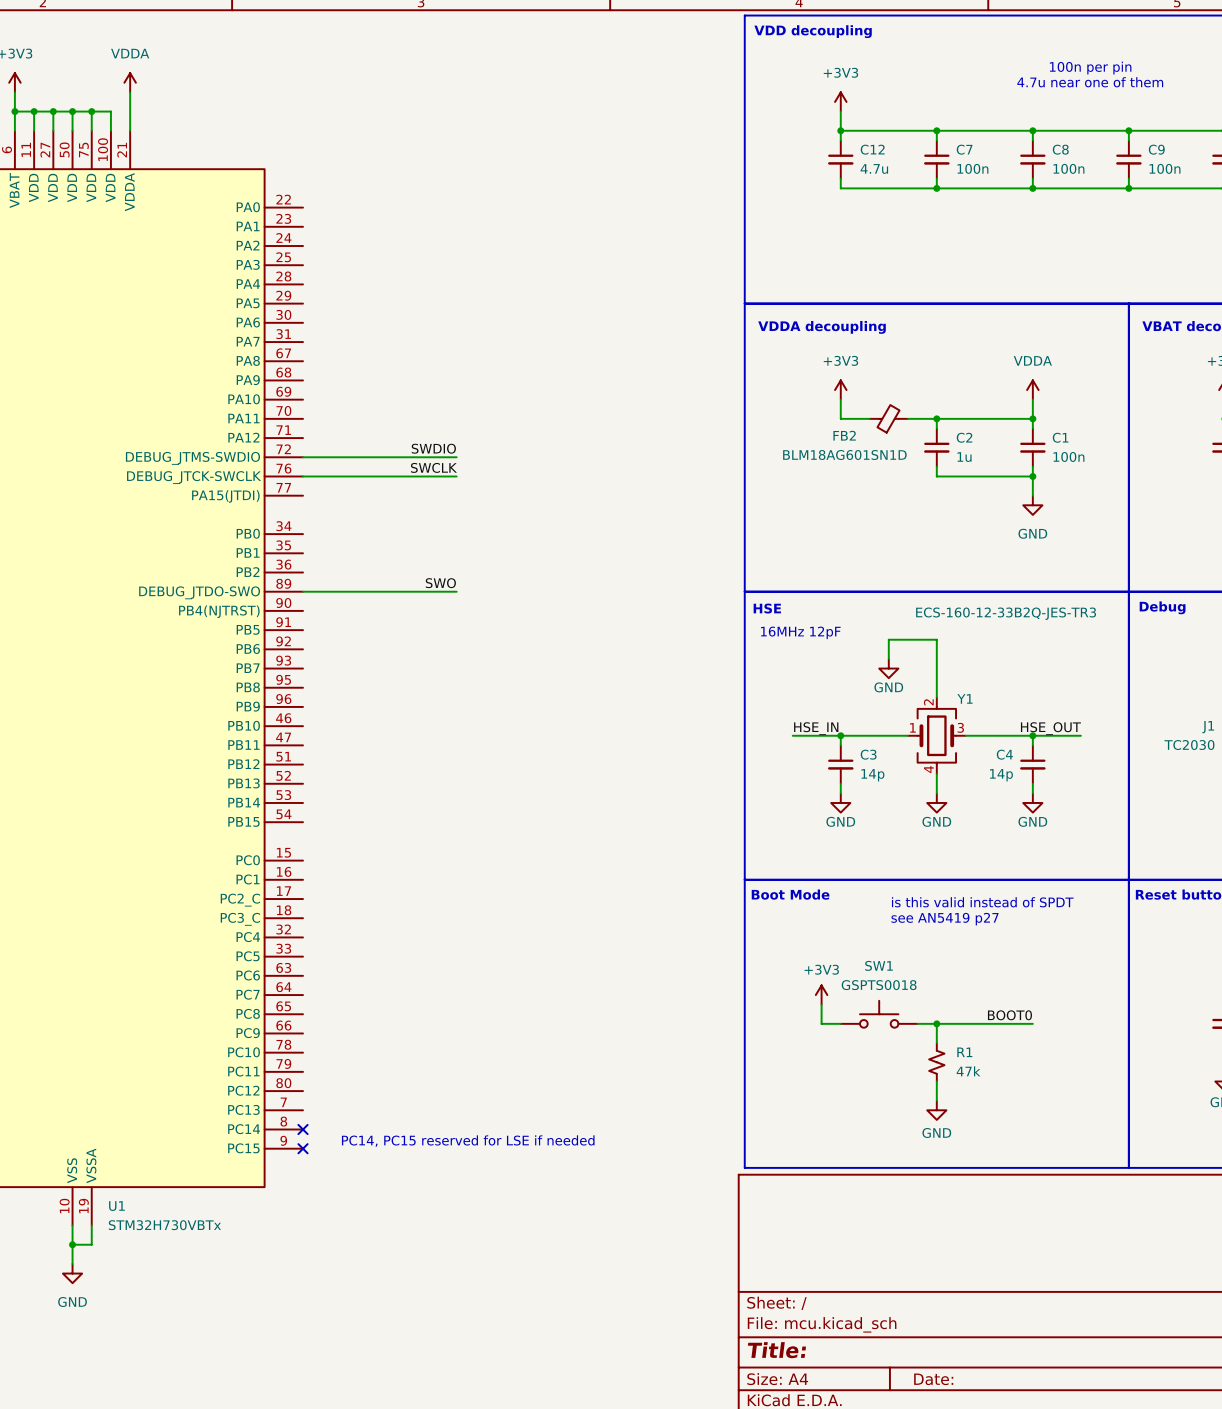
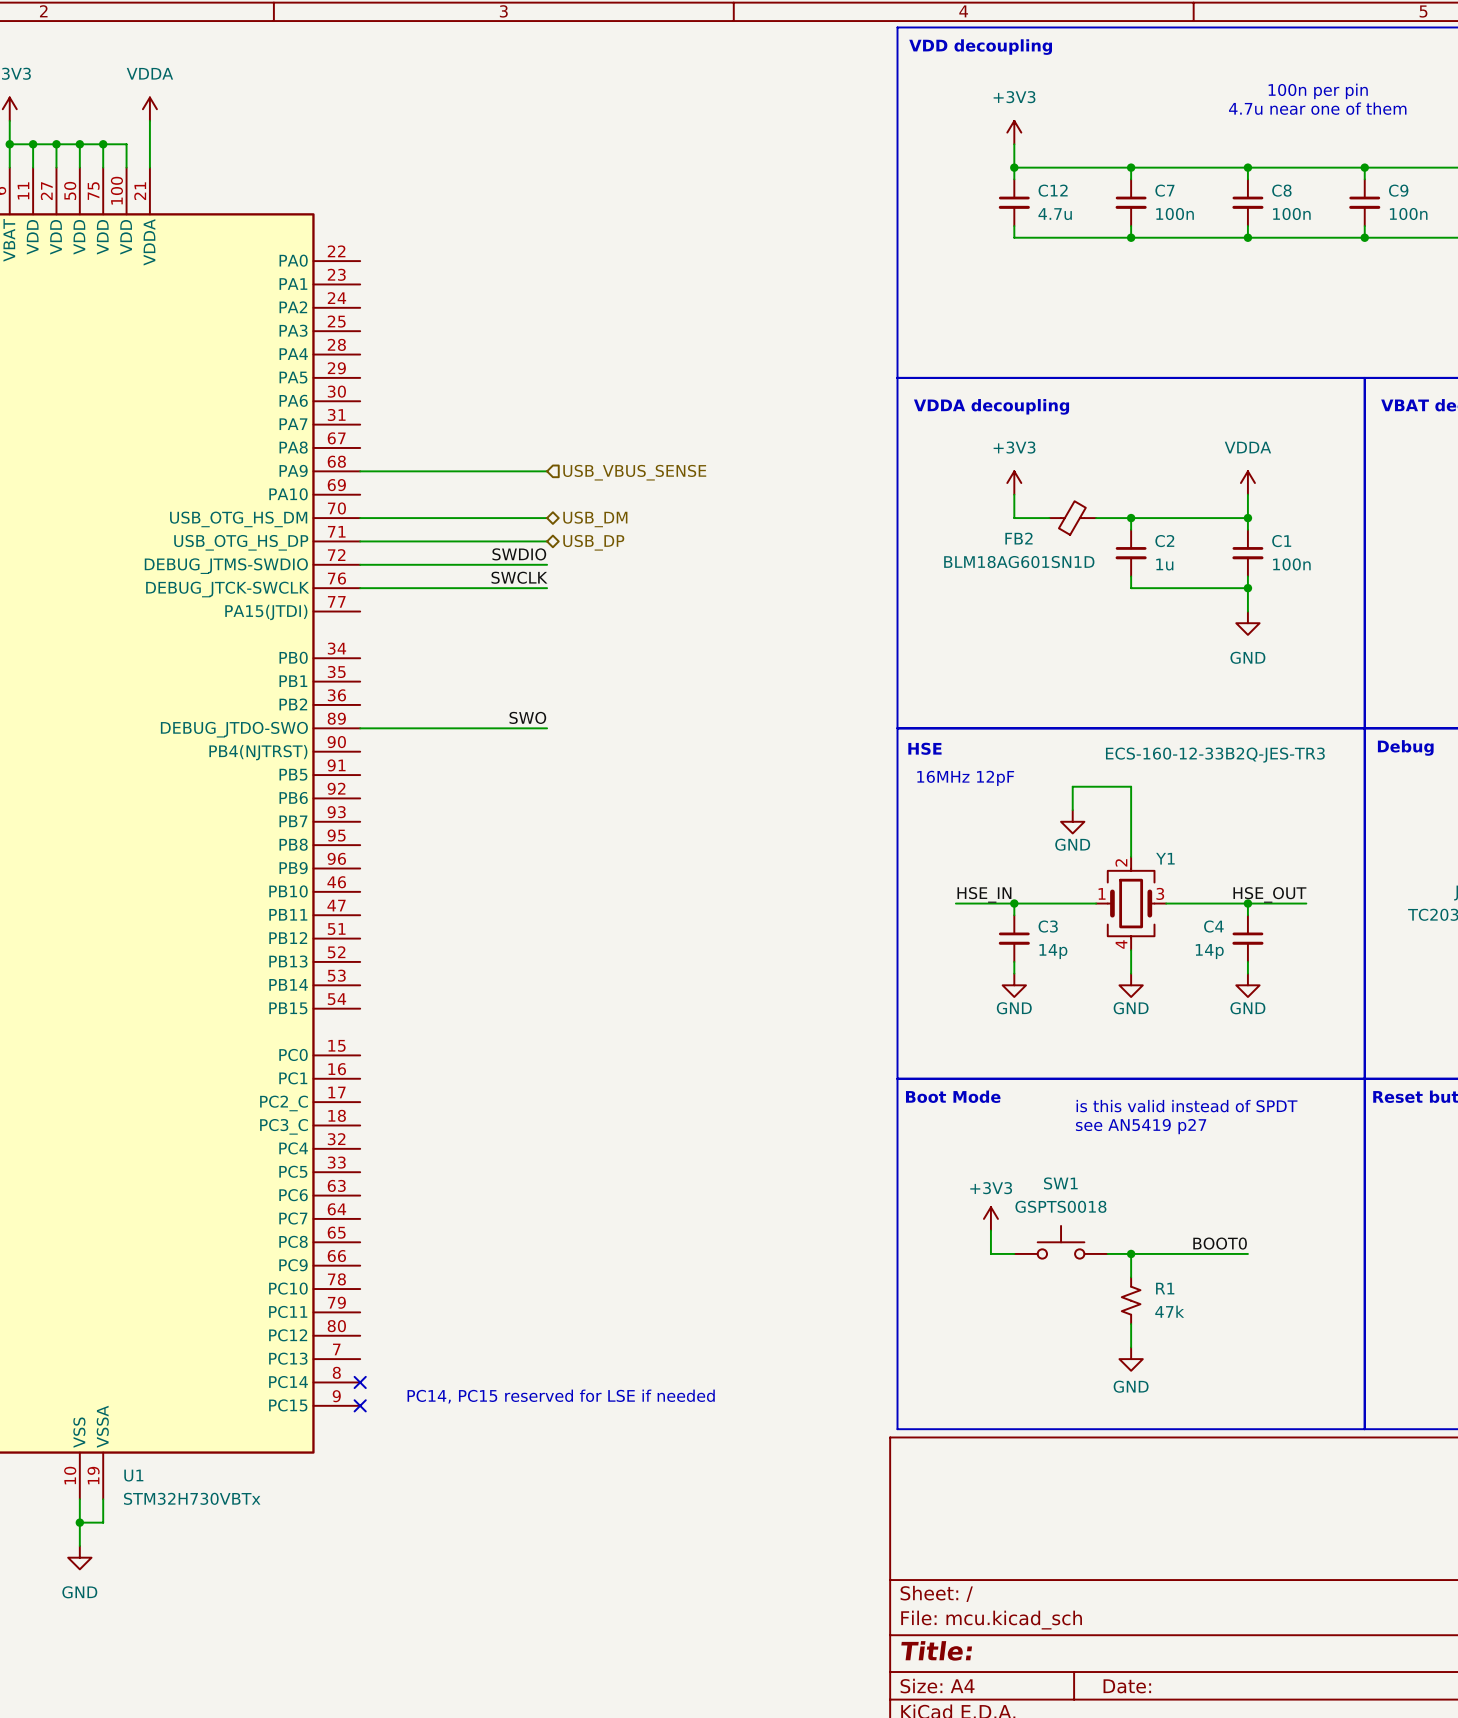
wire: none -> (360, 471) (547, 471)
hierarchical label: none -> USB_VBUS_SENSE (634, 472)
U1 pin name: PA11 (243, 418) -> USB_OTG_HS_DM (238, 519)
wire: none -> (360, 518) (547, 518)
hierarchical label: none -> USB_DM (595, 519)
U1 pin name: PA12 (243, 437) -> USB_OTG_HS_DP (241, 542)
wire: none -> (360, 541) (547, 541)
hierarchical label: none -> USB_DP (593, 542)

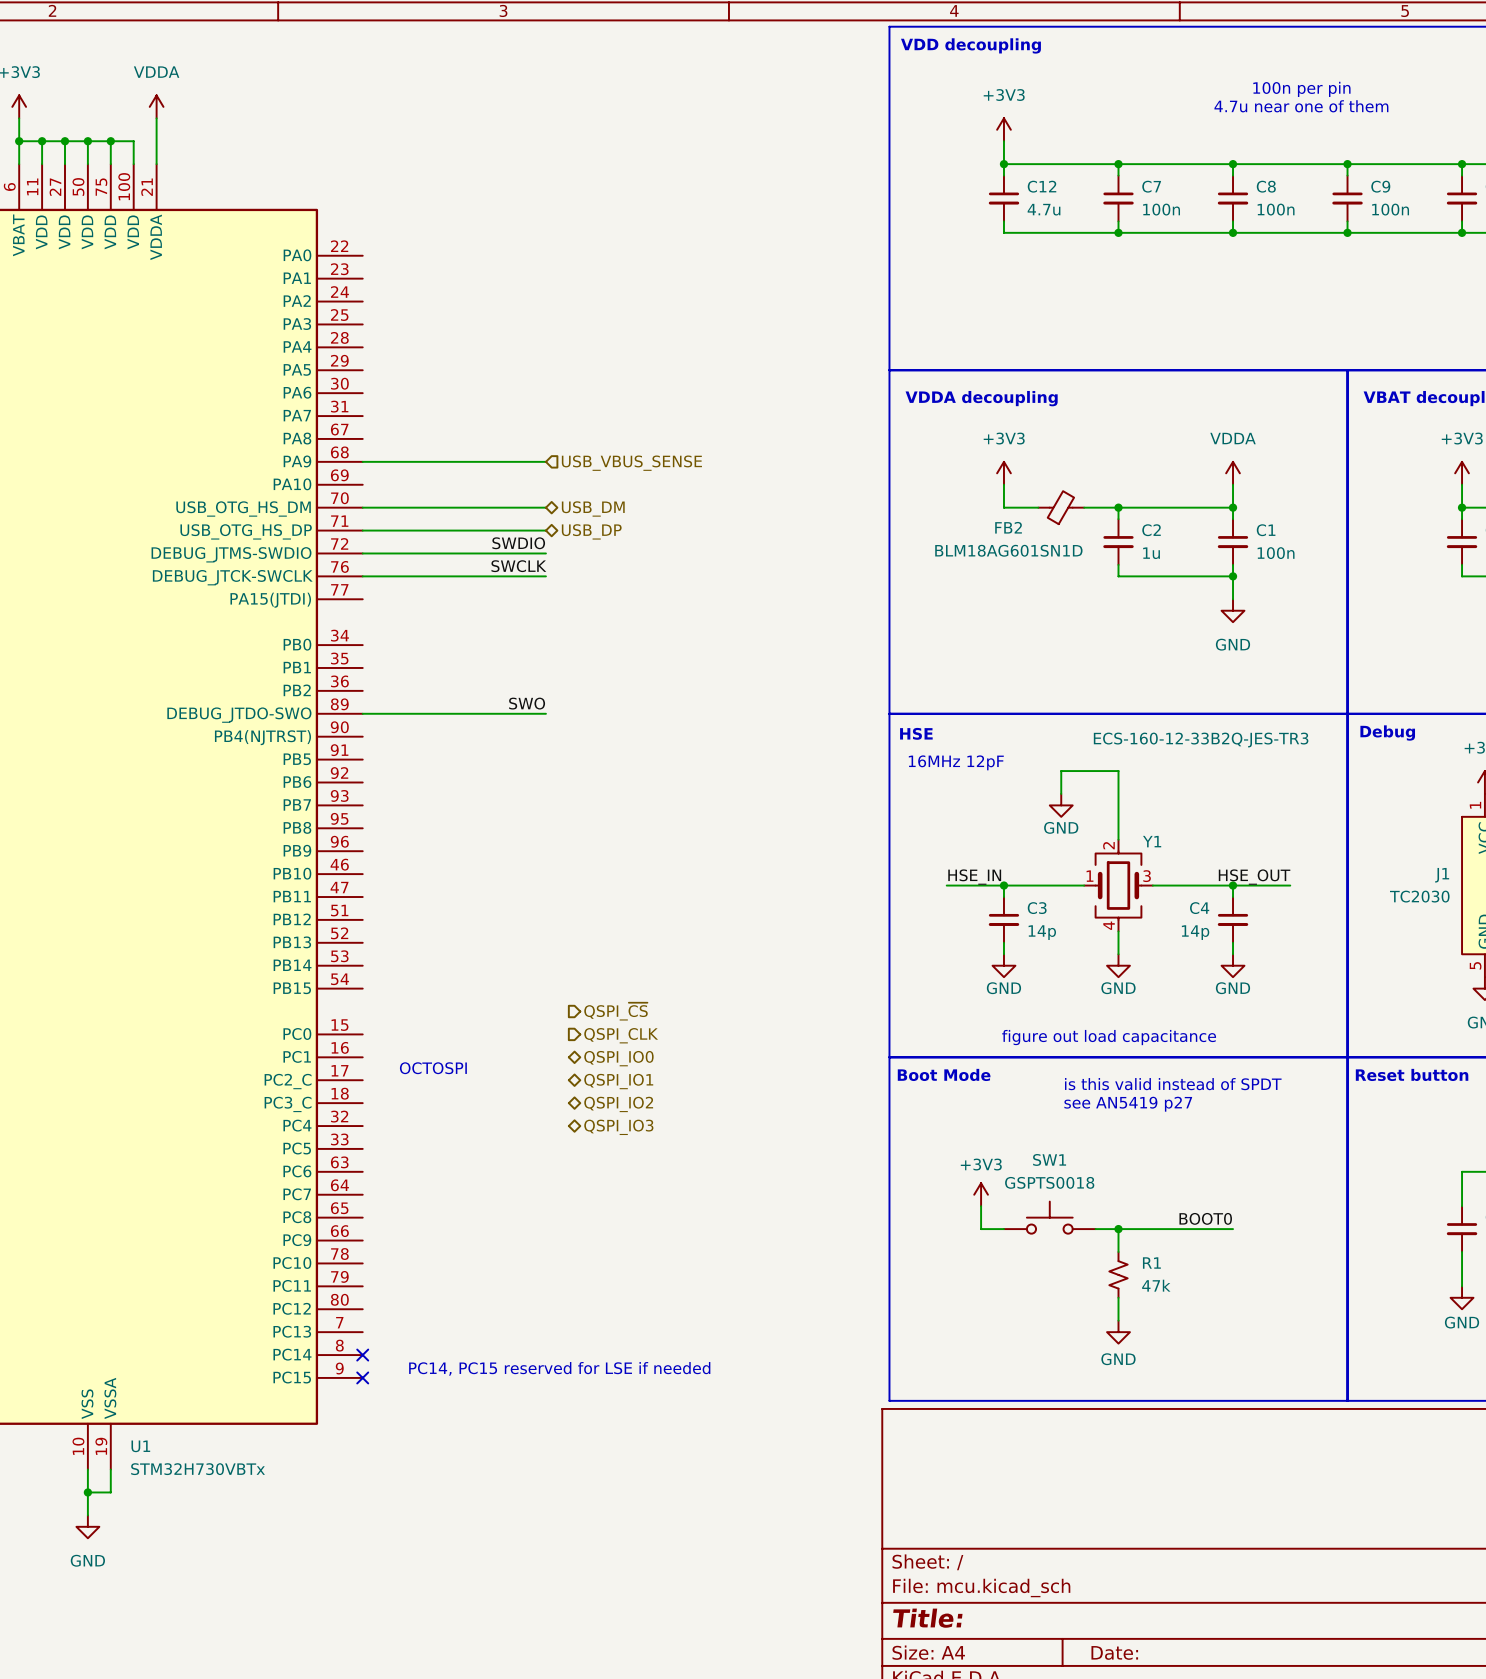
hierarchical label: none -> QSPI_~{CS} (616, 1011)
hierarchical label: none -> QSPI_CLK (621, 1035)
text: none -> figure out load capacitance (1109, 1037)
hierarchical label: none -> QSPI_IO0 (618, 1058)
text: none -> OCTOSPI (433, 1068)
hierarchical label: none -> QSPI_IO1 (618, 1081)
hierarchical label: none -> QSPI_IO2 (618, 1104)
hierarchical label: none -> QSPI_IO3 (618, 1127)

